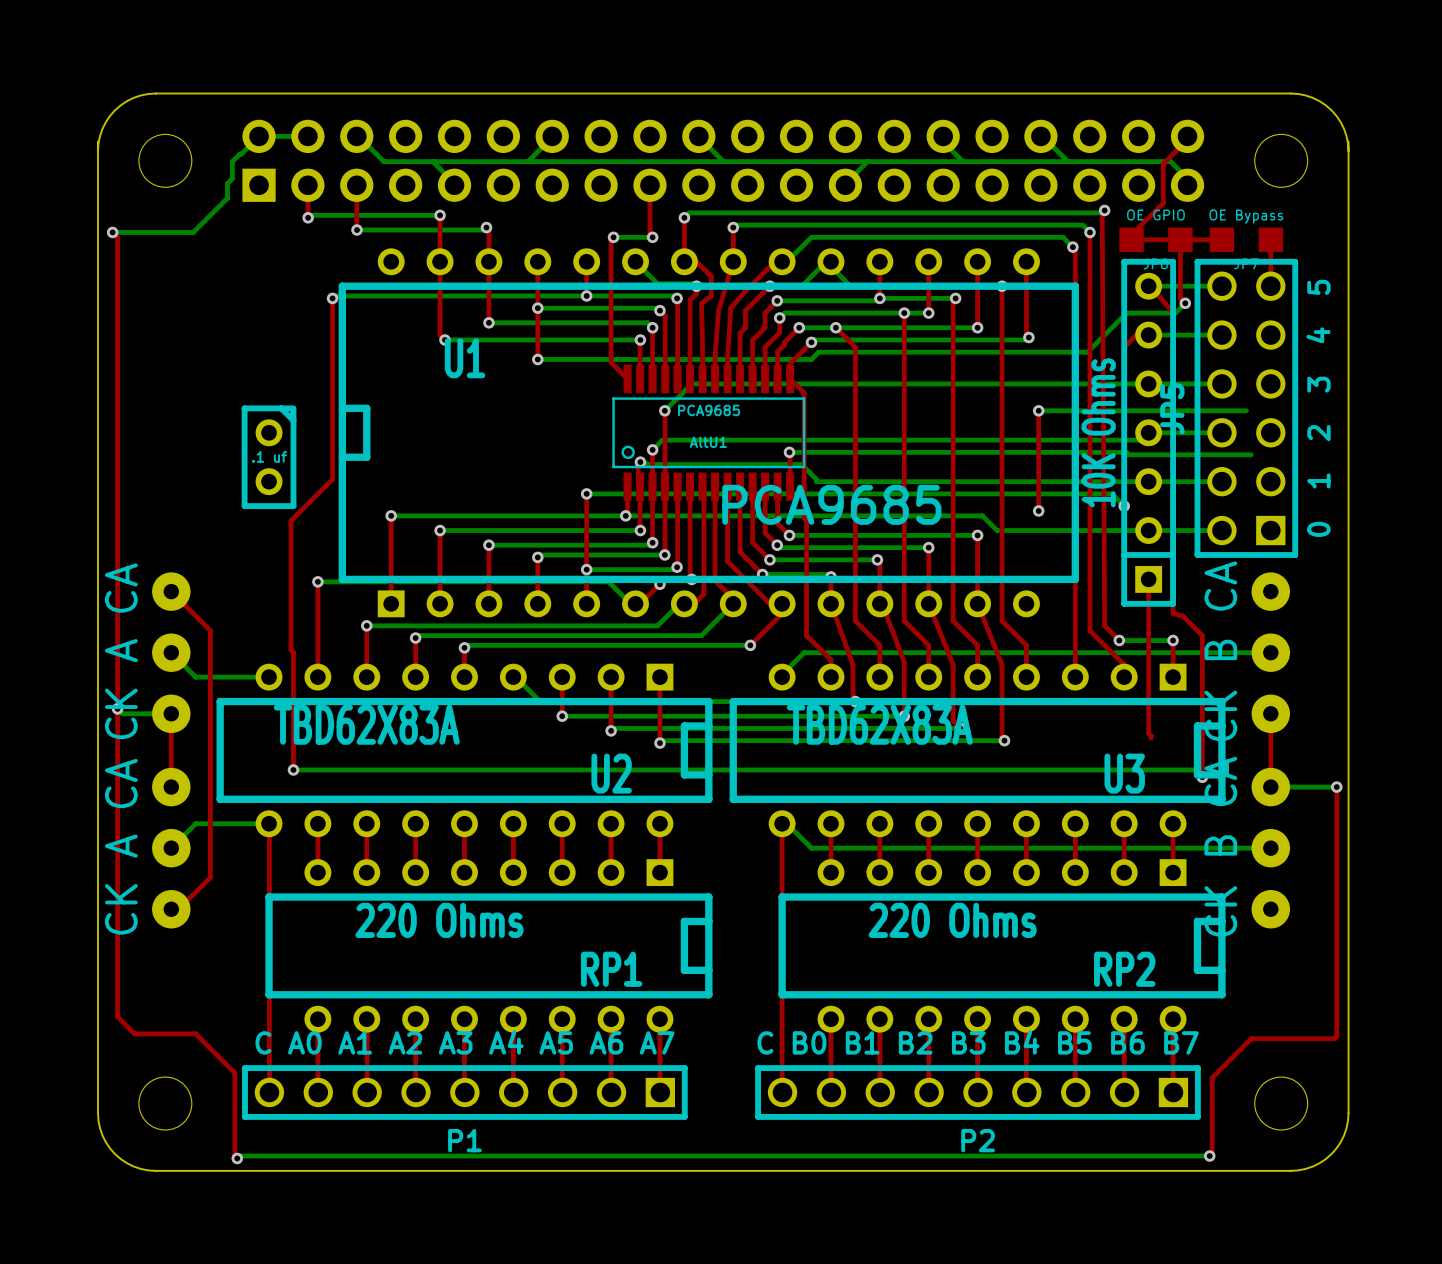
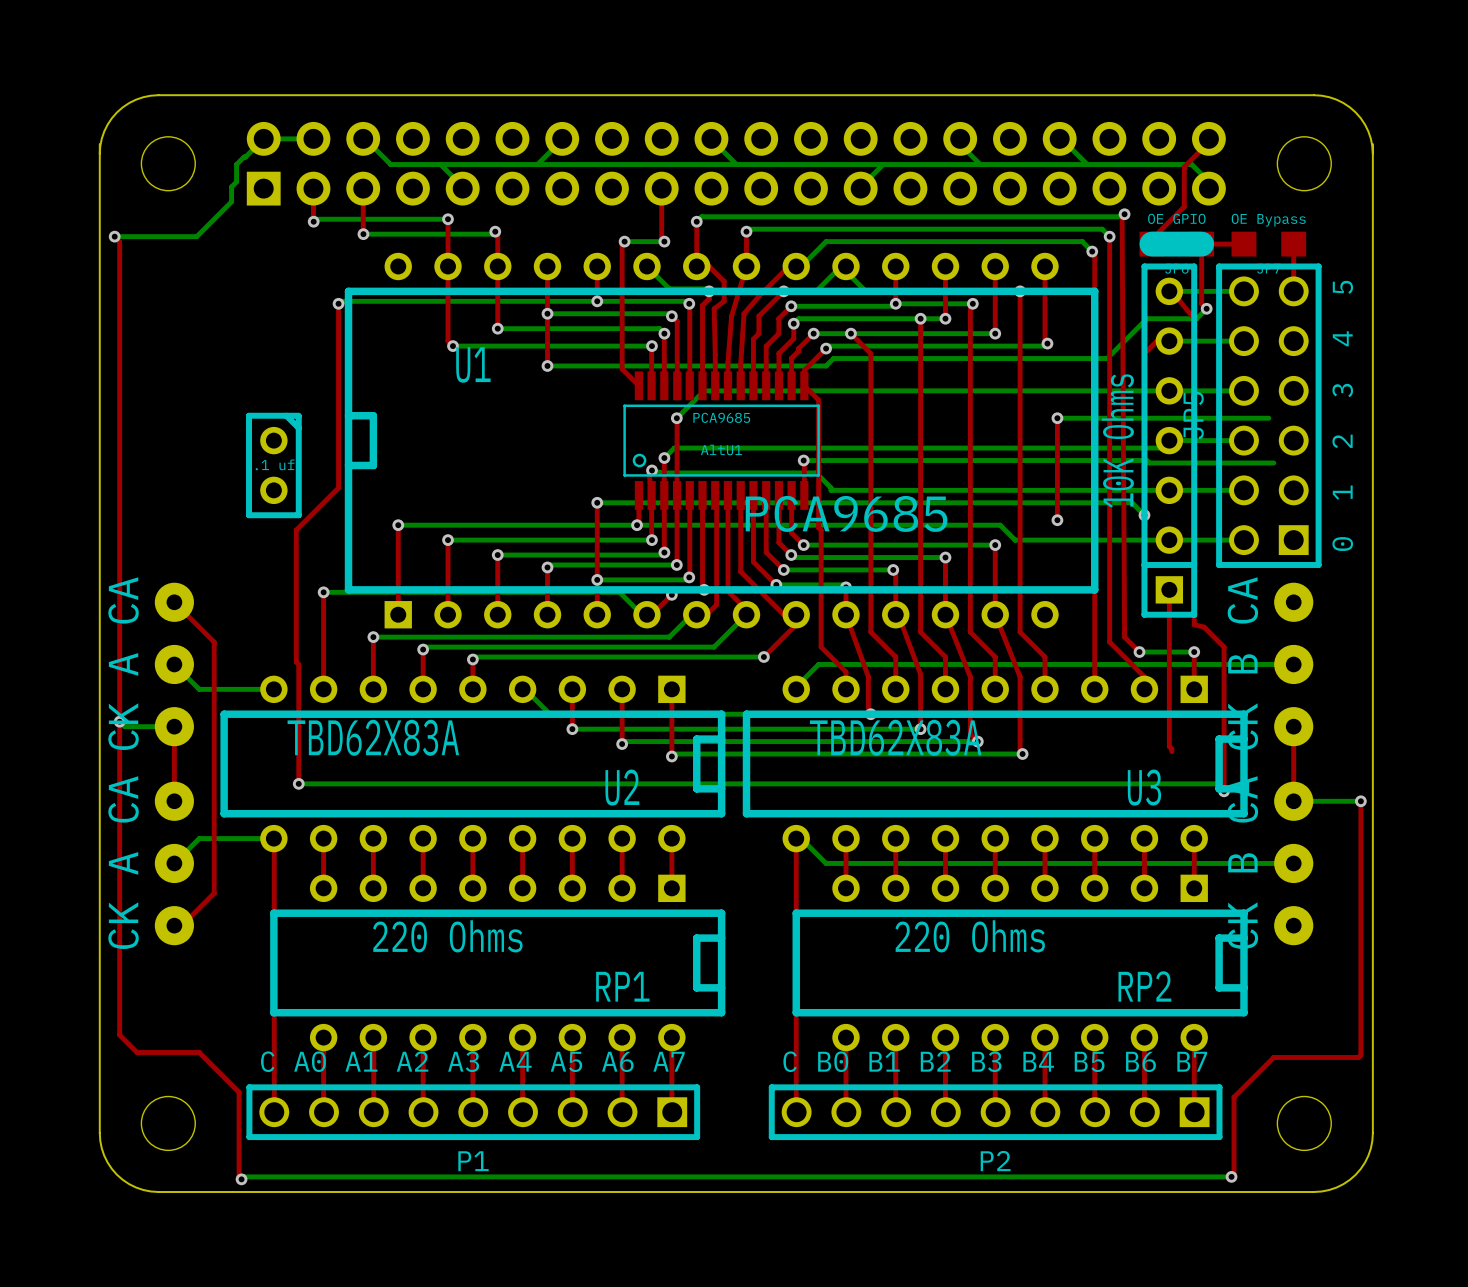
part footprint: [1119, 227, 1193, 252] -> [1139, 231, 1215, 257]

